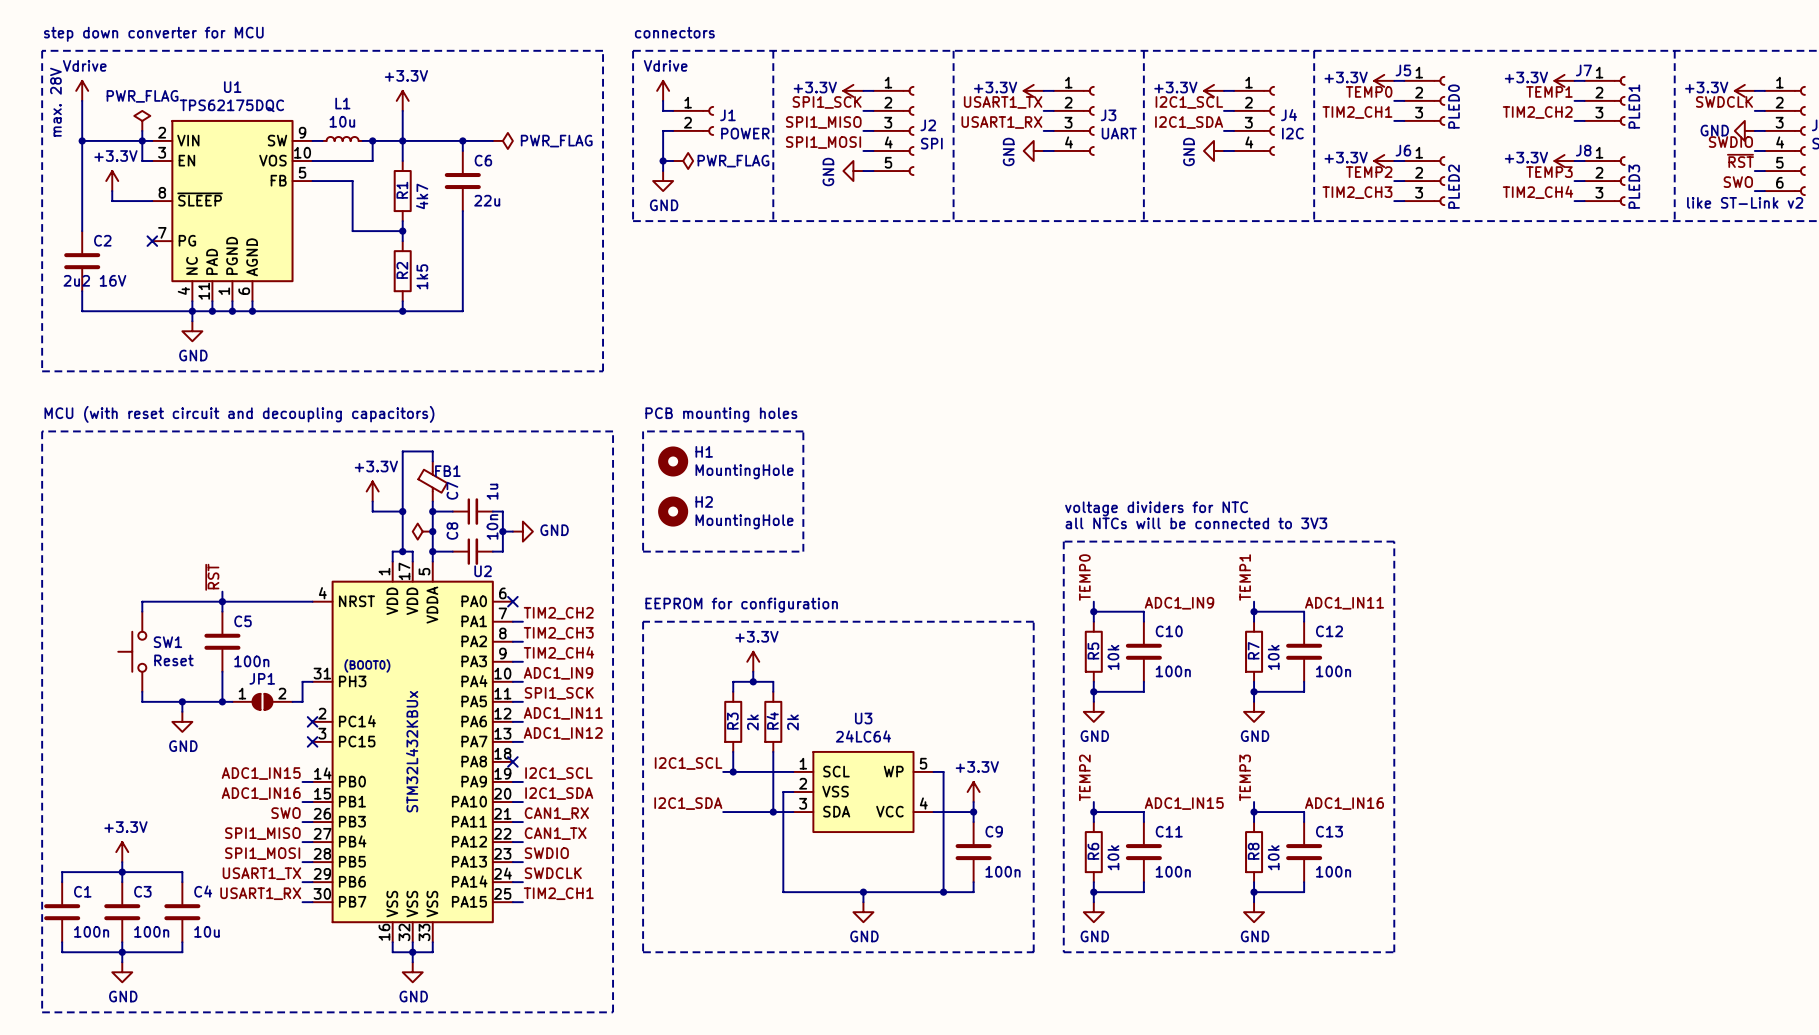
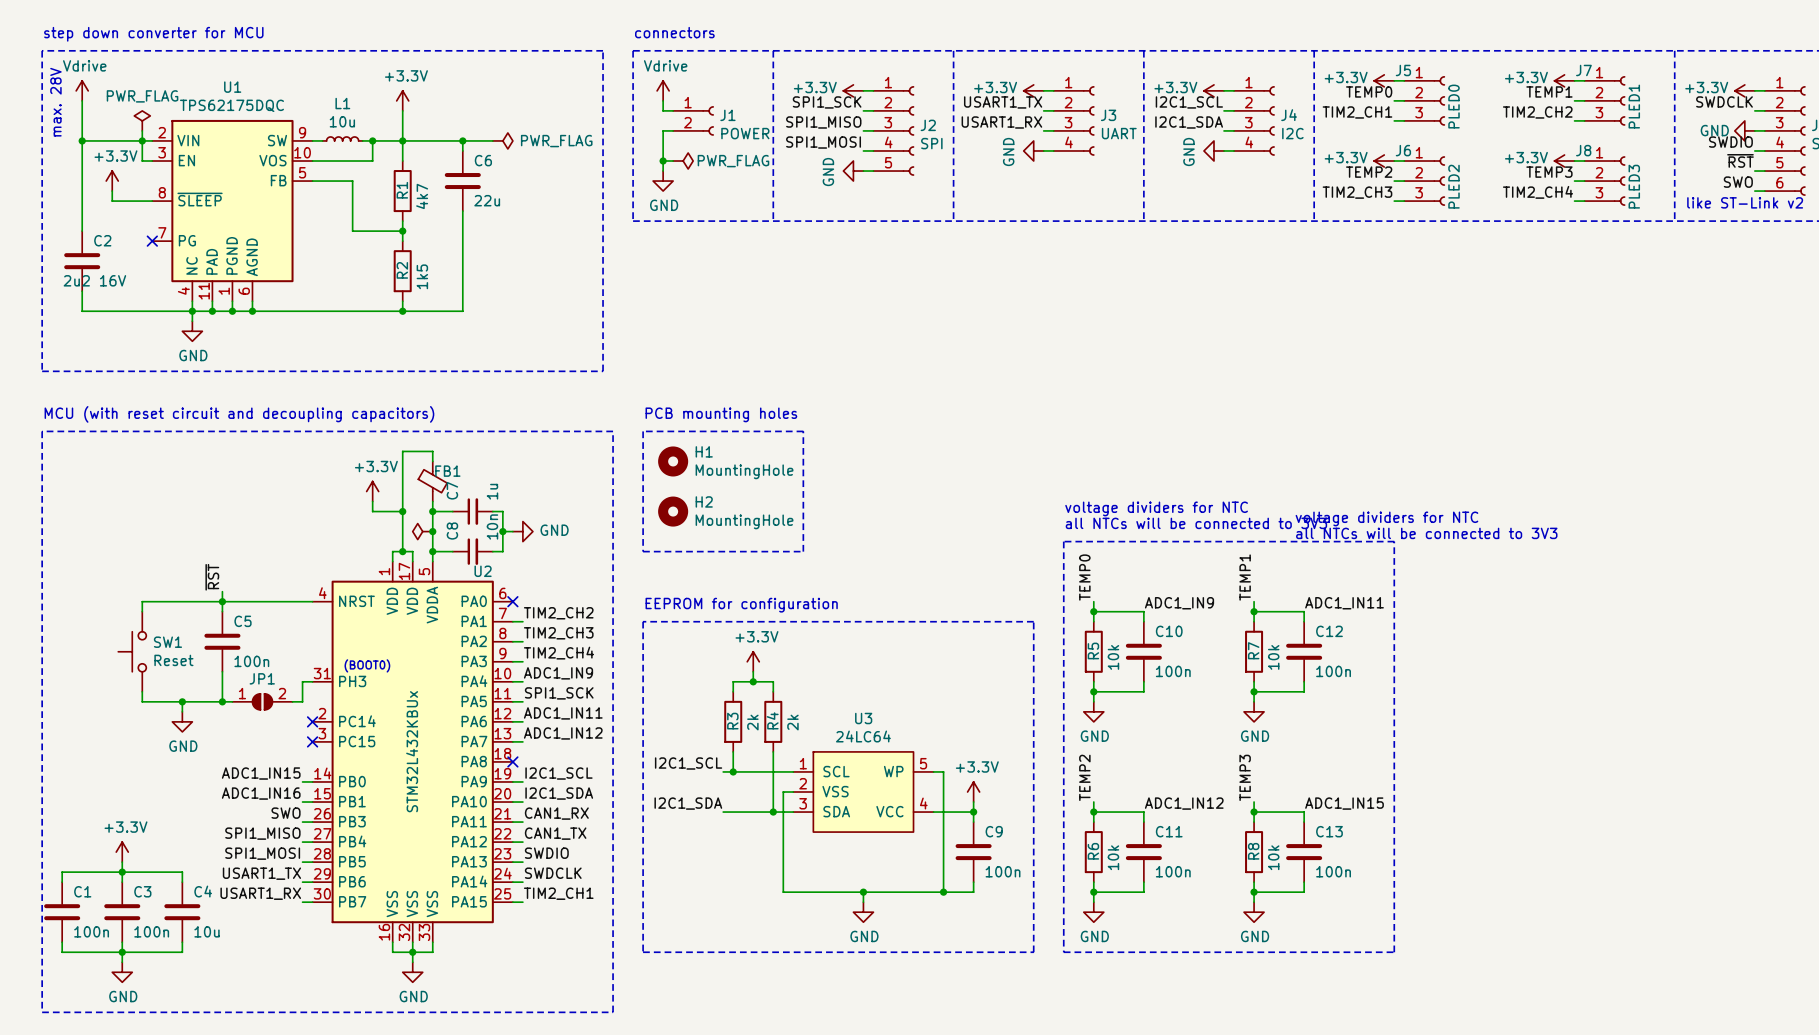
text: none -> voltage dividers for NTC (1386, 518)
text: none -> all NTCs will be connected to 3V3 (1426, 533)
label: ADC1_IN15 (1184, 803) -> ADC1_IN12 (1184, 803)
label: ADC1_IN16 (1344, 803) -> ADC1_IN15 (1344, 803)

